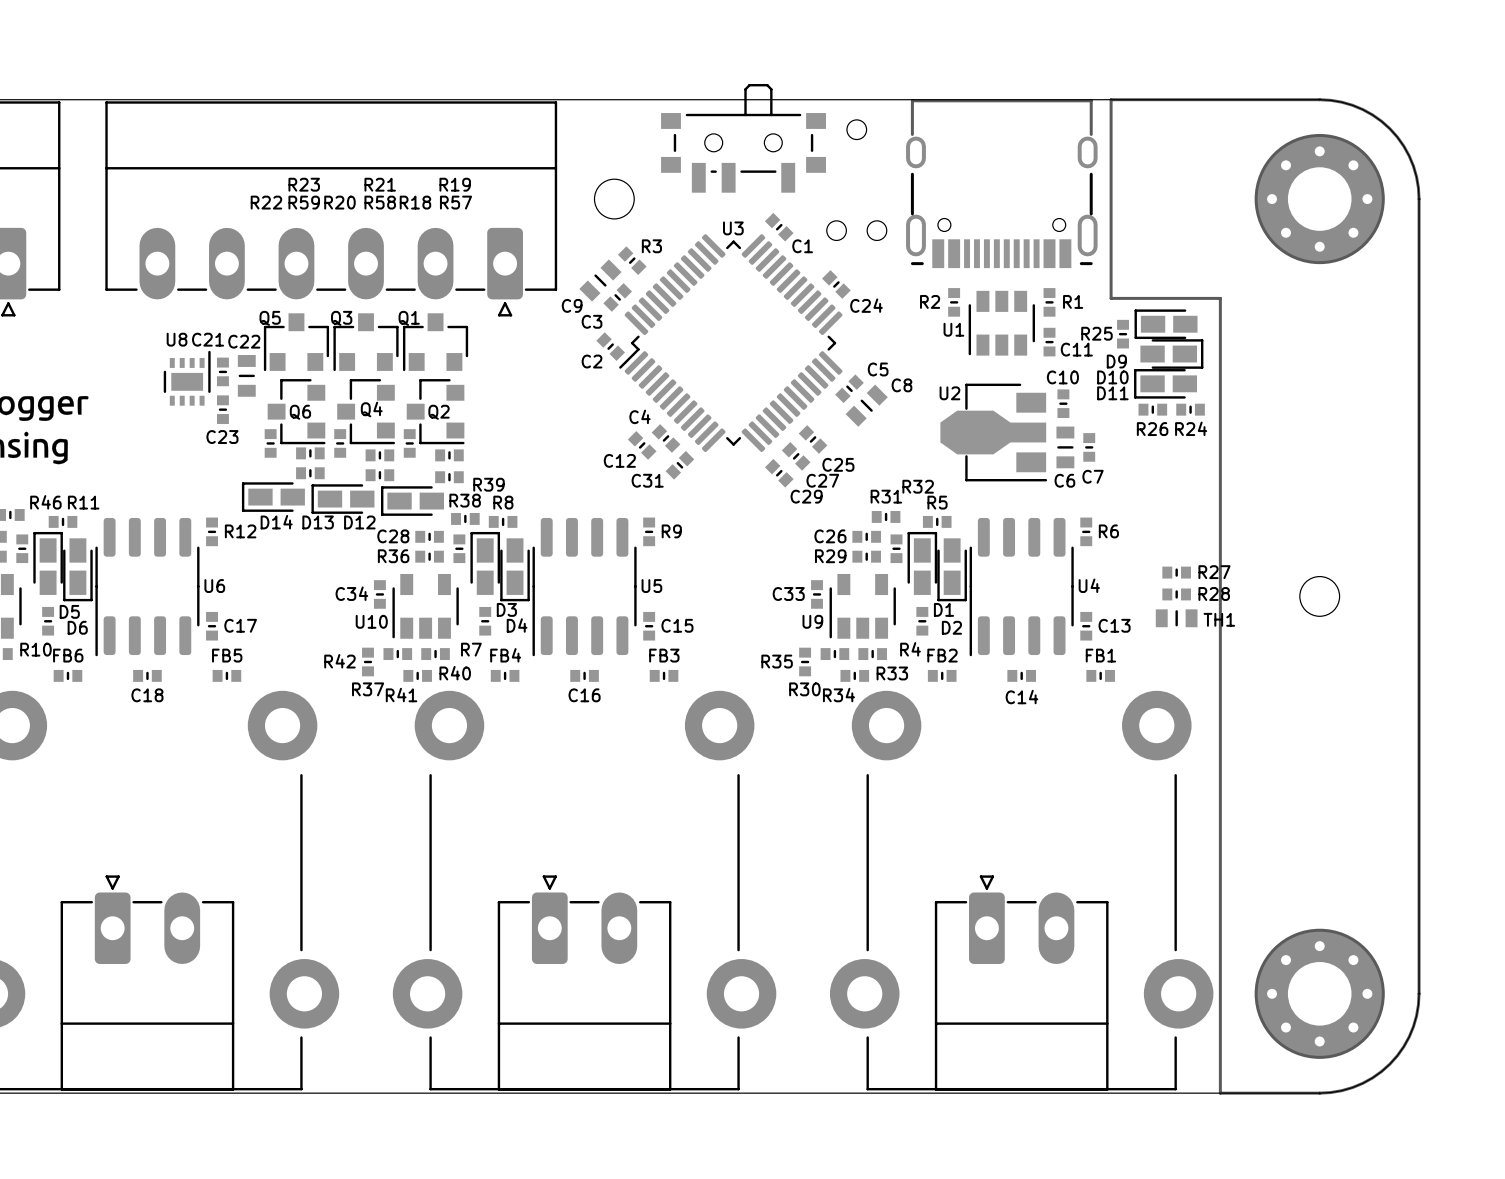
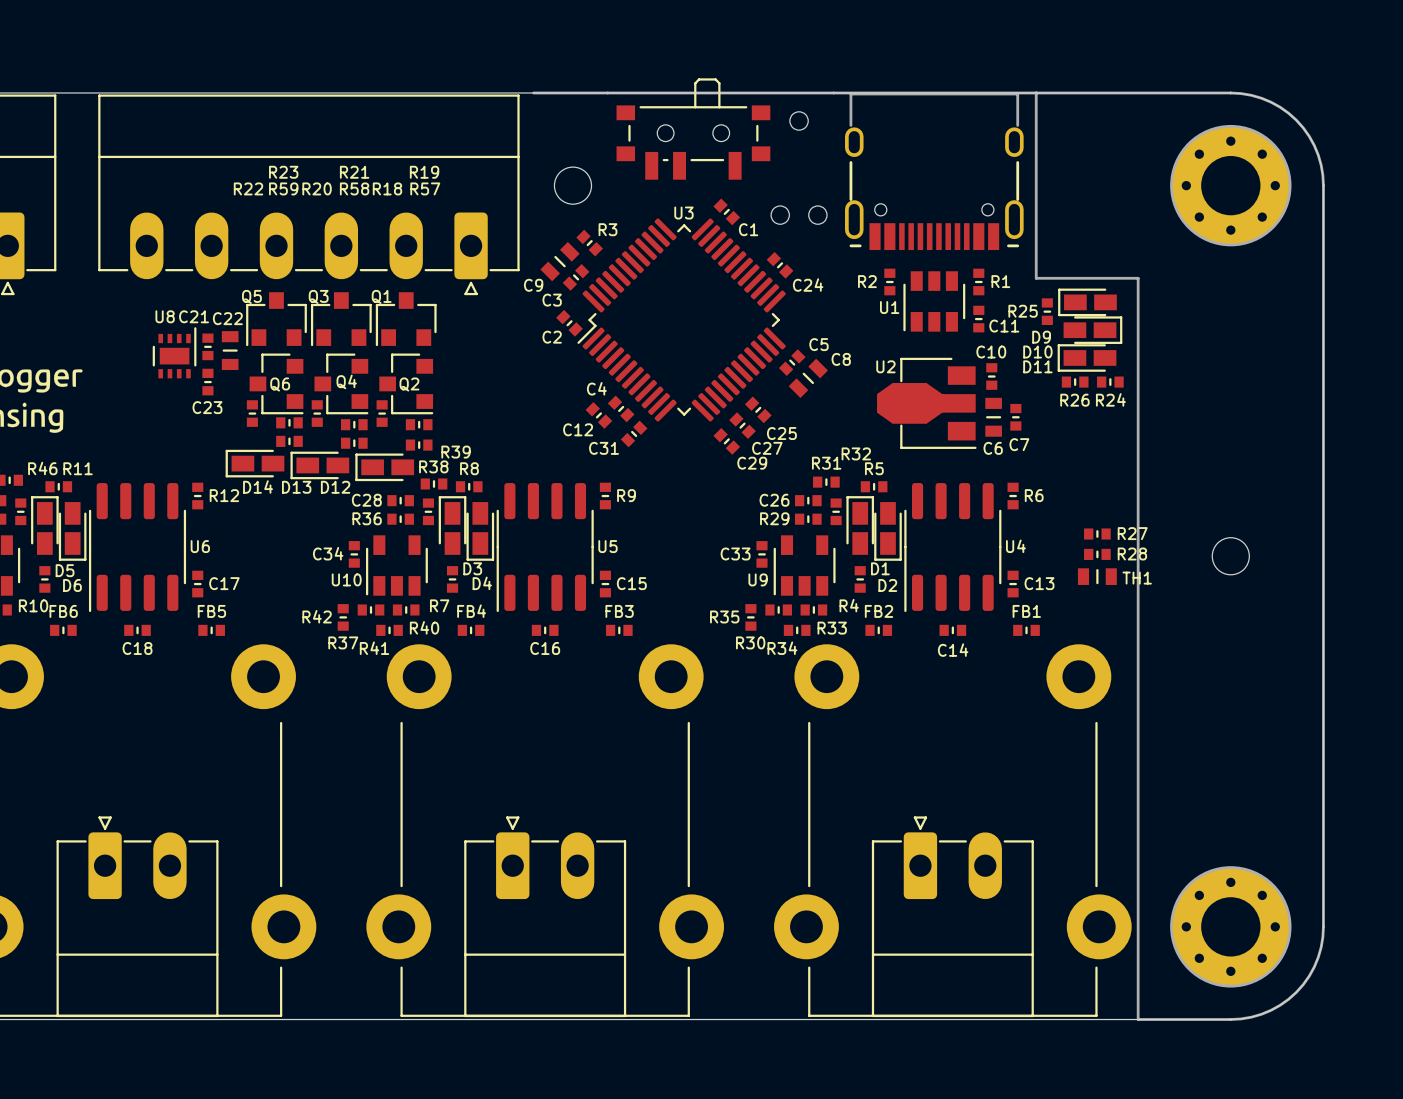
line: none -> (533, 92) (1036, 92)

